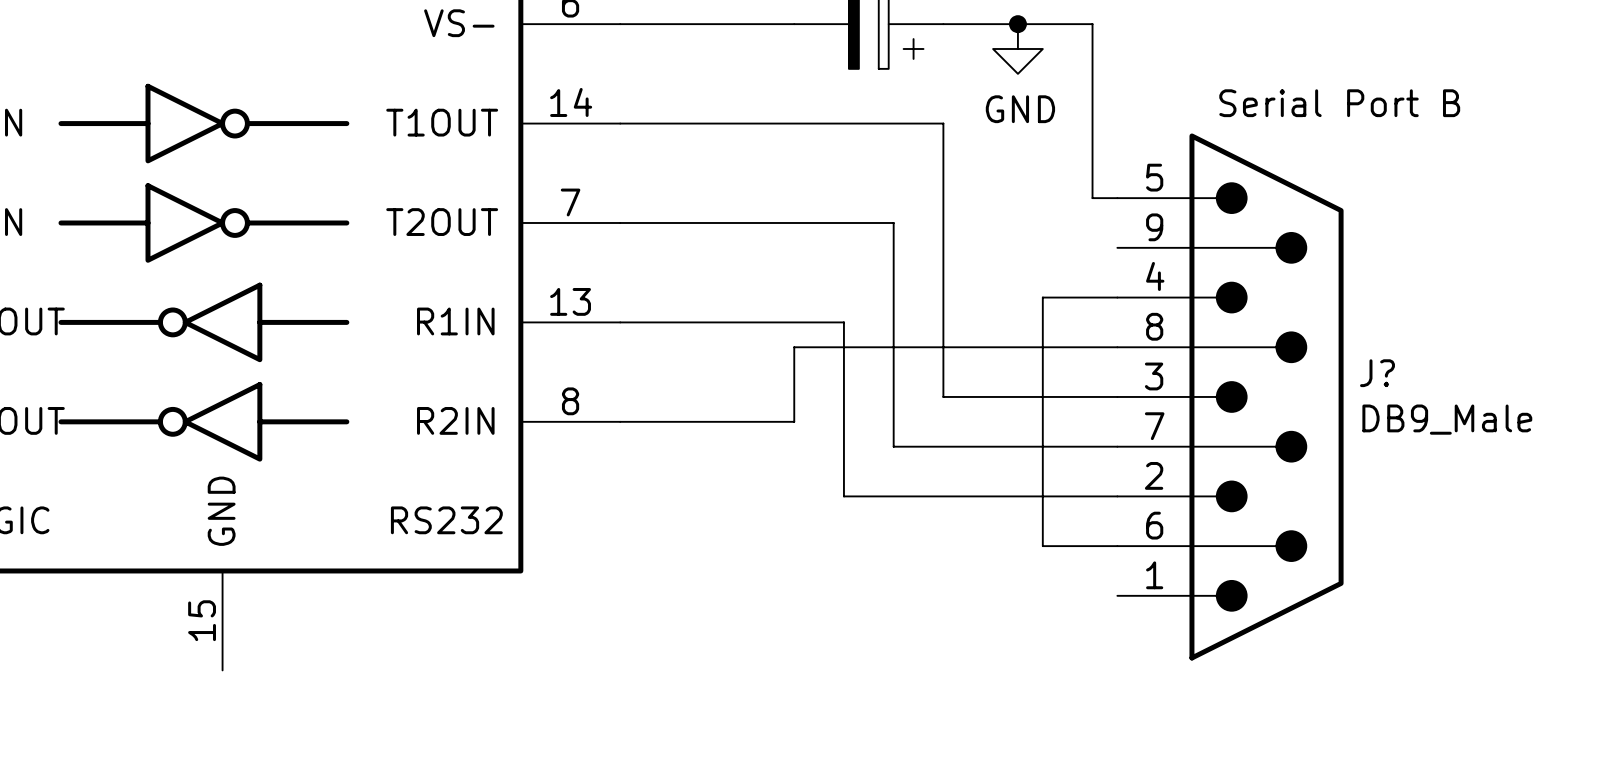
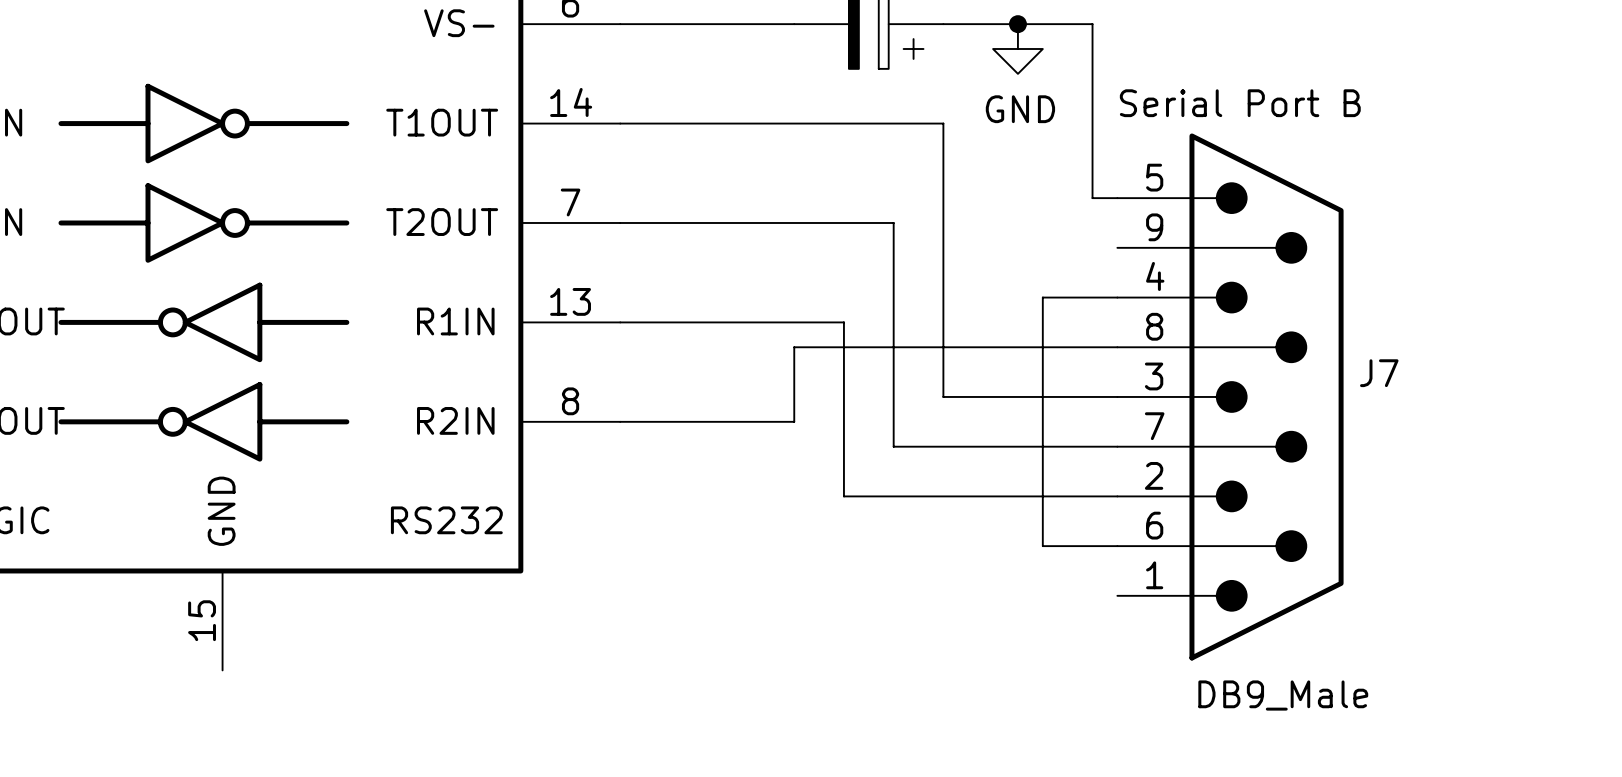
text position: Serial Port B (1339, 103) -> Serial Port B (1240, 103)
J? name: J? (1377, 373) -> J7 (1379, 373)
J? value position: DB9_Male (1447, 419) -> DB9_Male (1283, 695)

